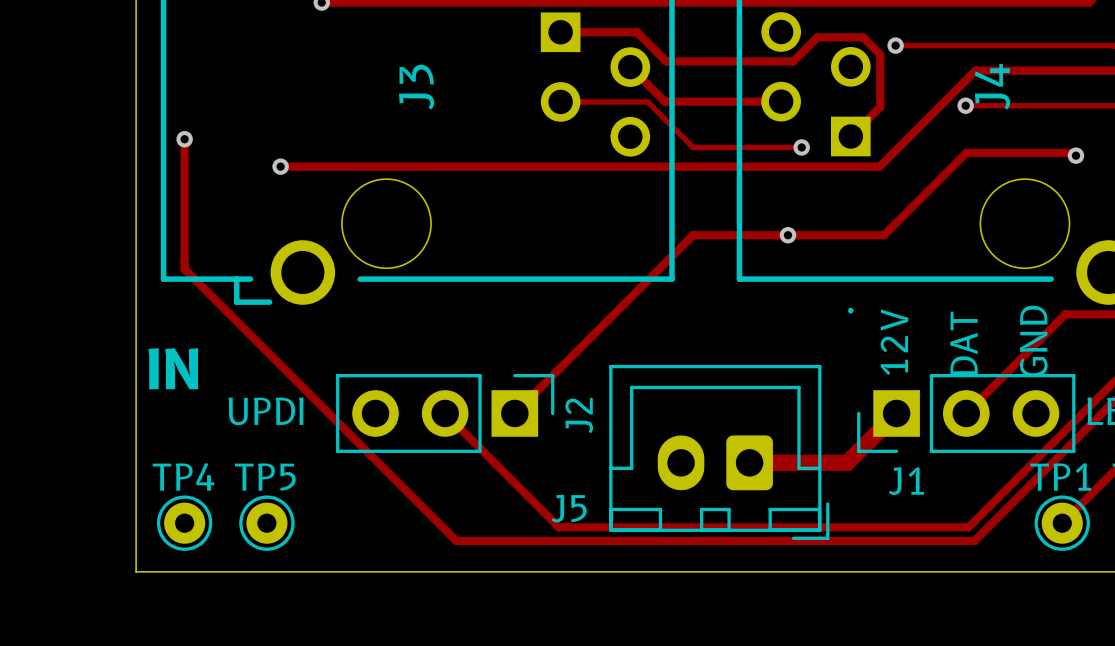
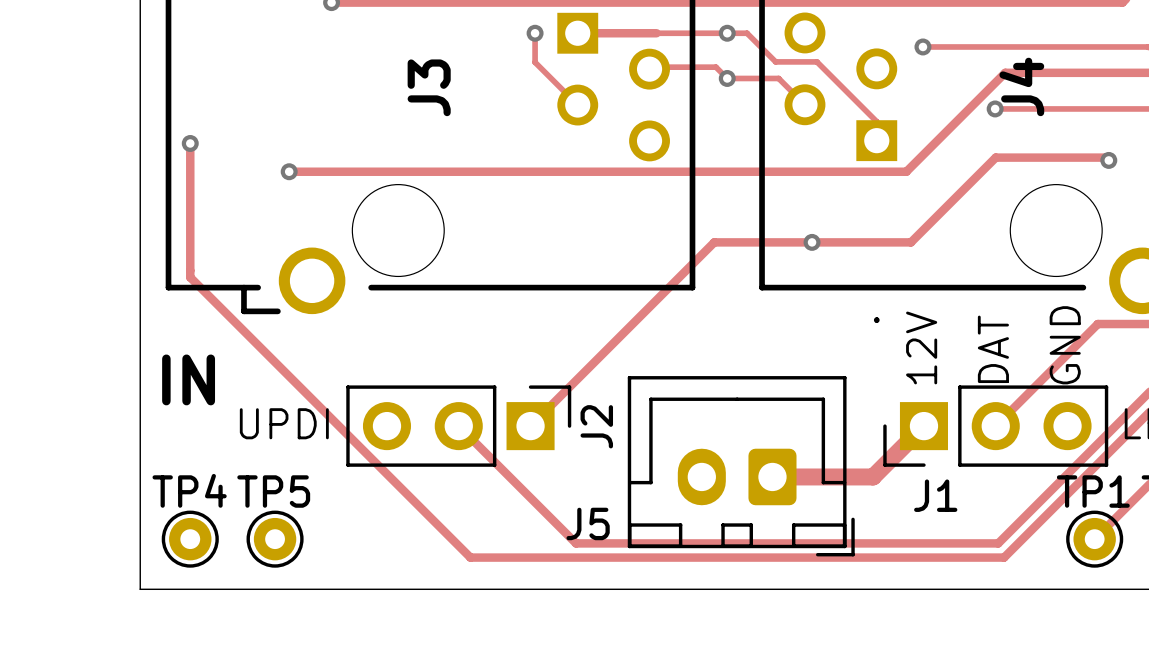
via: none -> (535, 33)
track: (637, 32) (666, 61) (793, 61) (817, 37) (863, 37) (880, 54) (880, 107) (850, 136) -> (656, 33) (747, 33) (775, 61) (816, 61) (876, 121) (876, 140)
via: none -> (727, 33)
track: (630, 67) (664, 101) (781, 101) -> (649, 69) (651, 67) (715, 67) (727, 78) (778, 78) (804, 104)
via: none -> (727, 78)
track: (560, 101) (647, 101) (693, 147) (801, 147) -> (577, 105) (535, 62) (535, 33)
via: (801, 147) -> none

